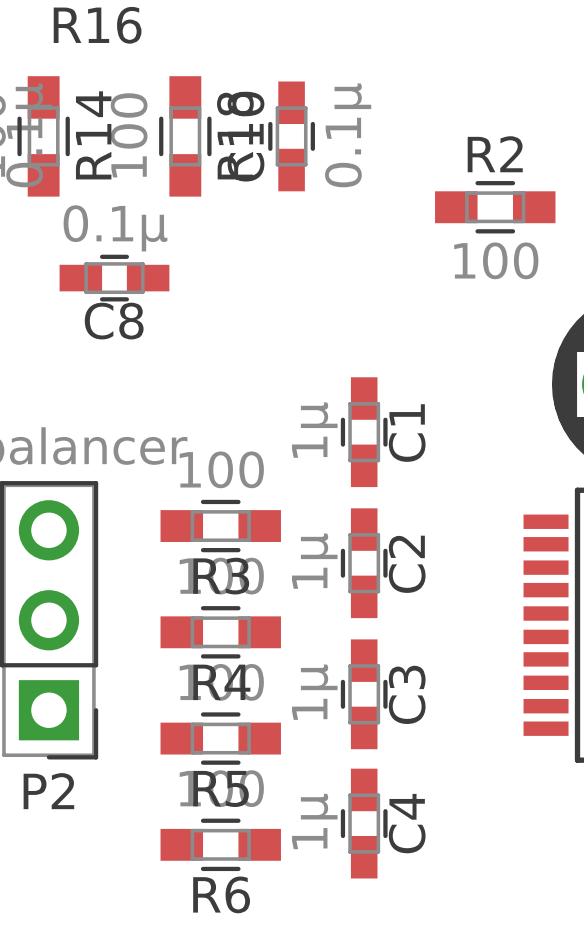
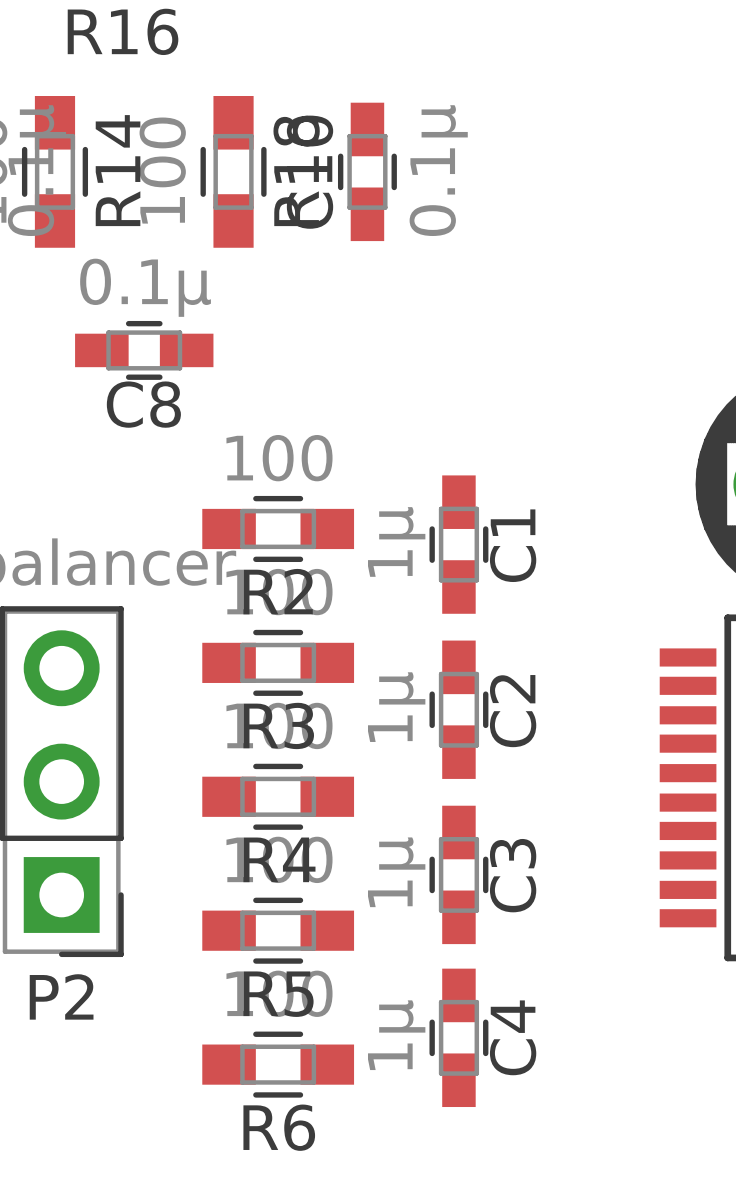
R2 name position: R2 (495, 154) -> R2 (278, 591)
R2 position: (495, 207) -> (278, 528)
R2 value position: 100 (496, 260) -> 100 (279, 458)

